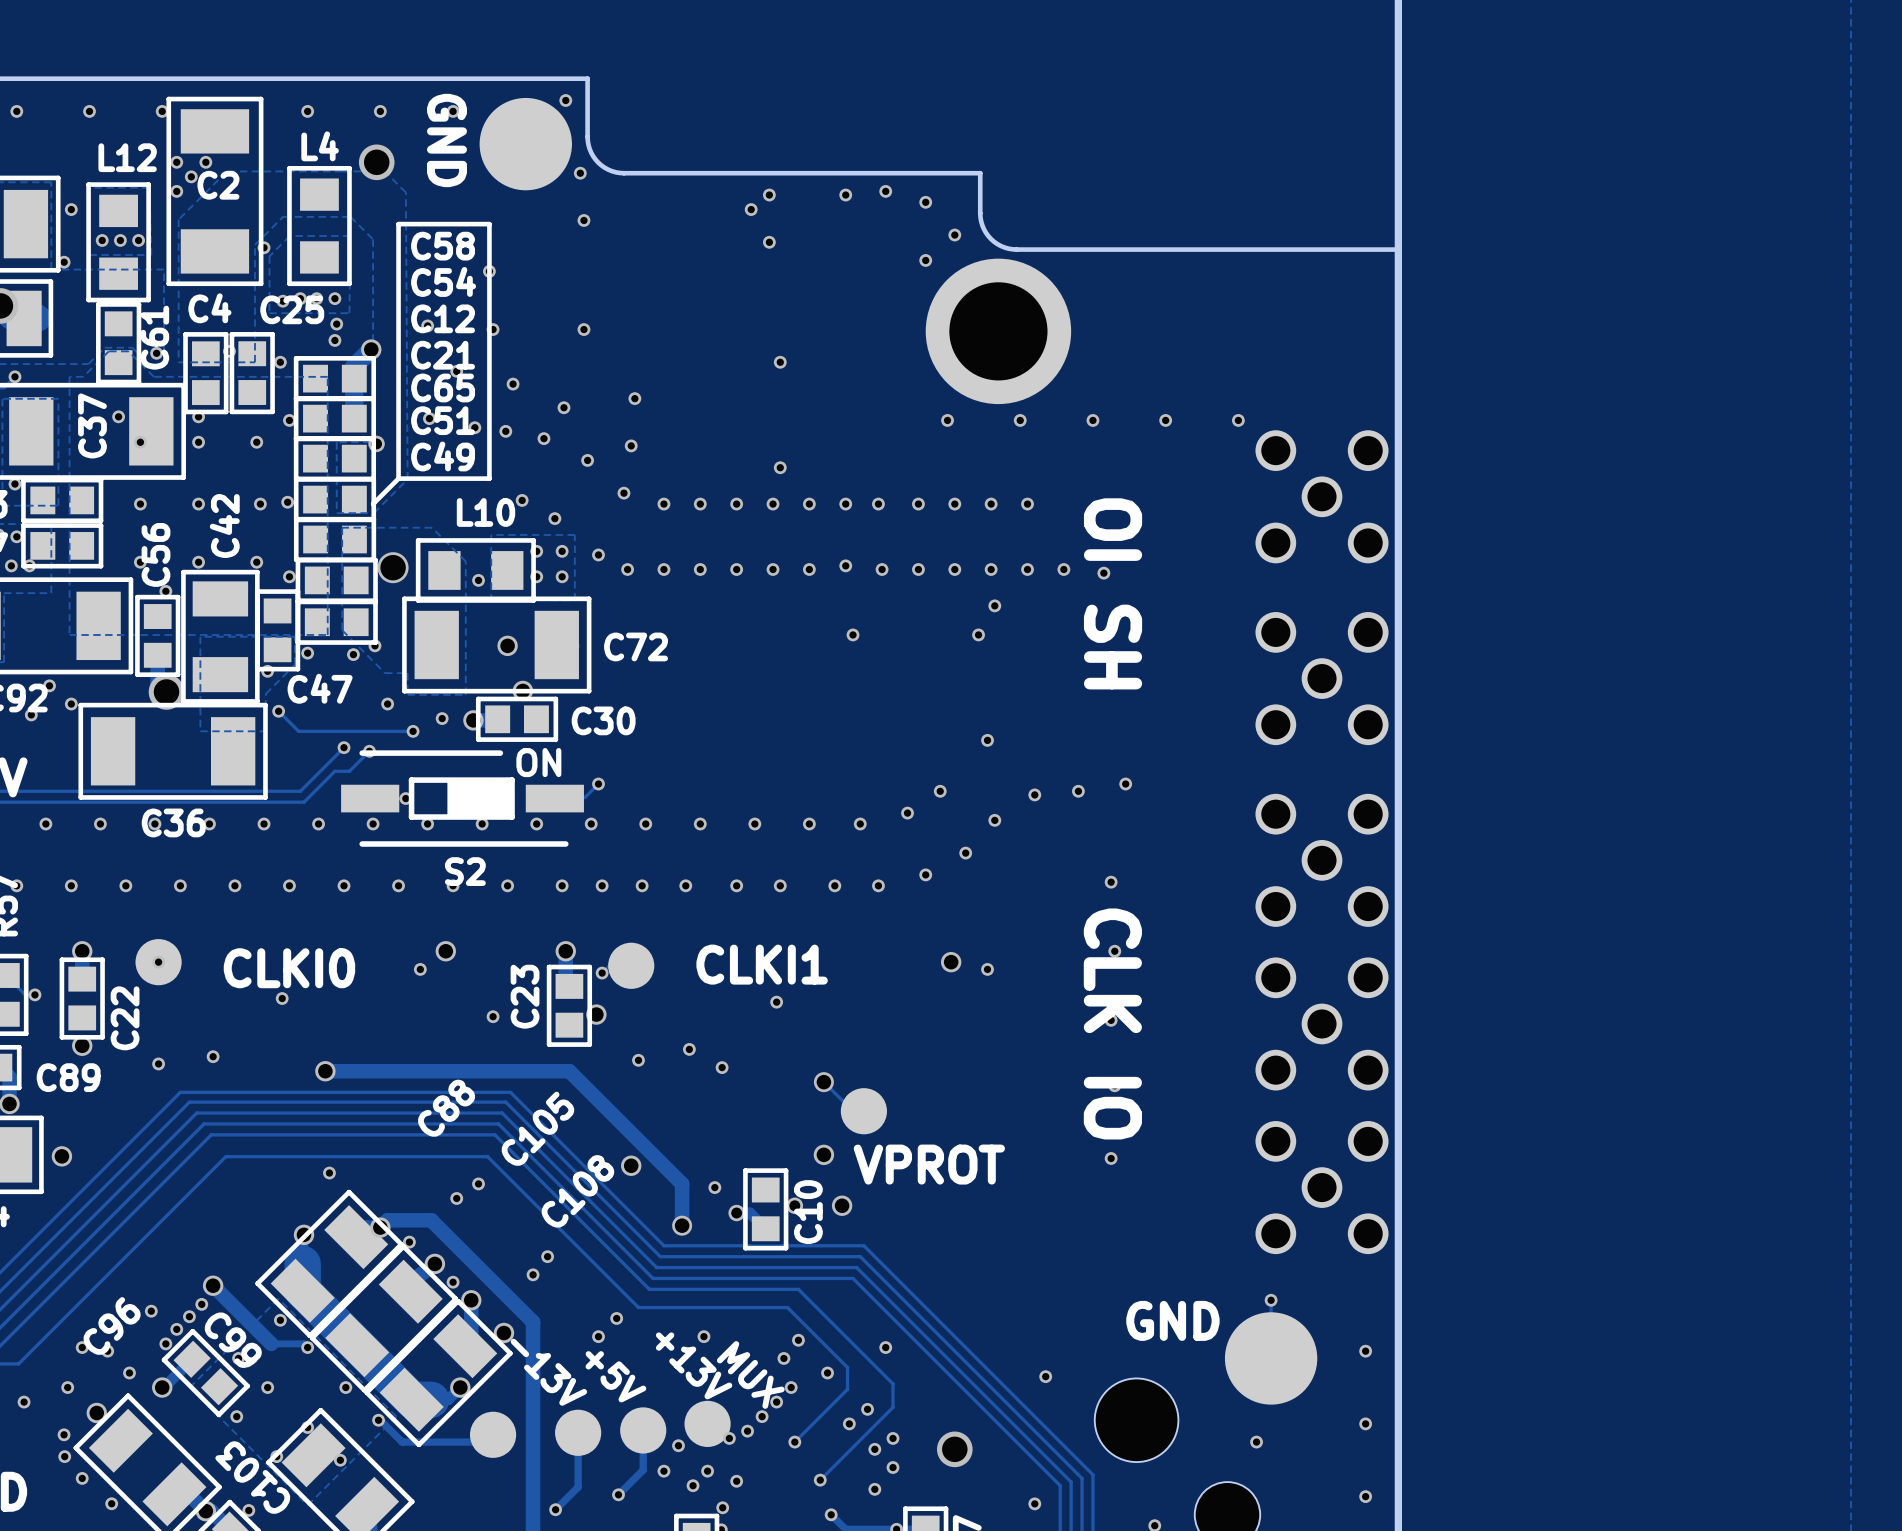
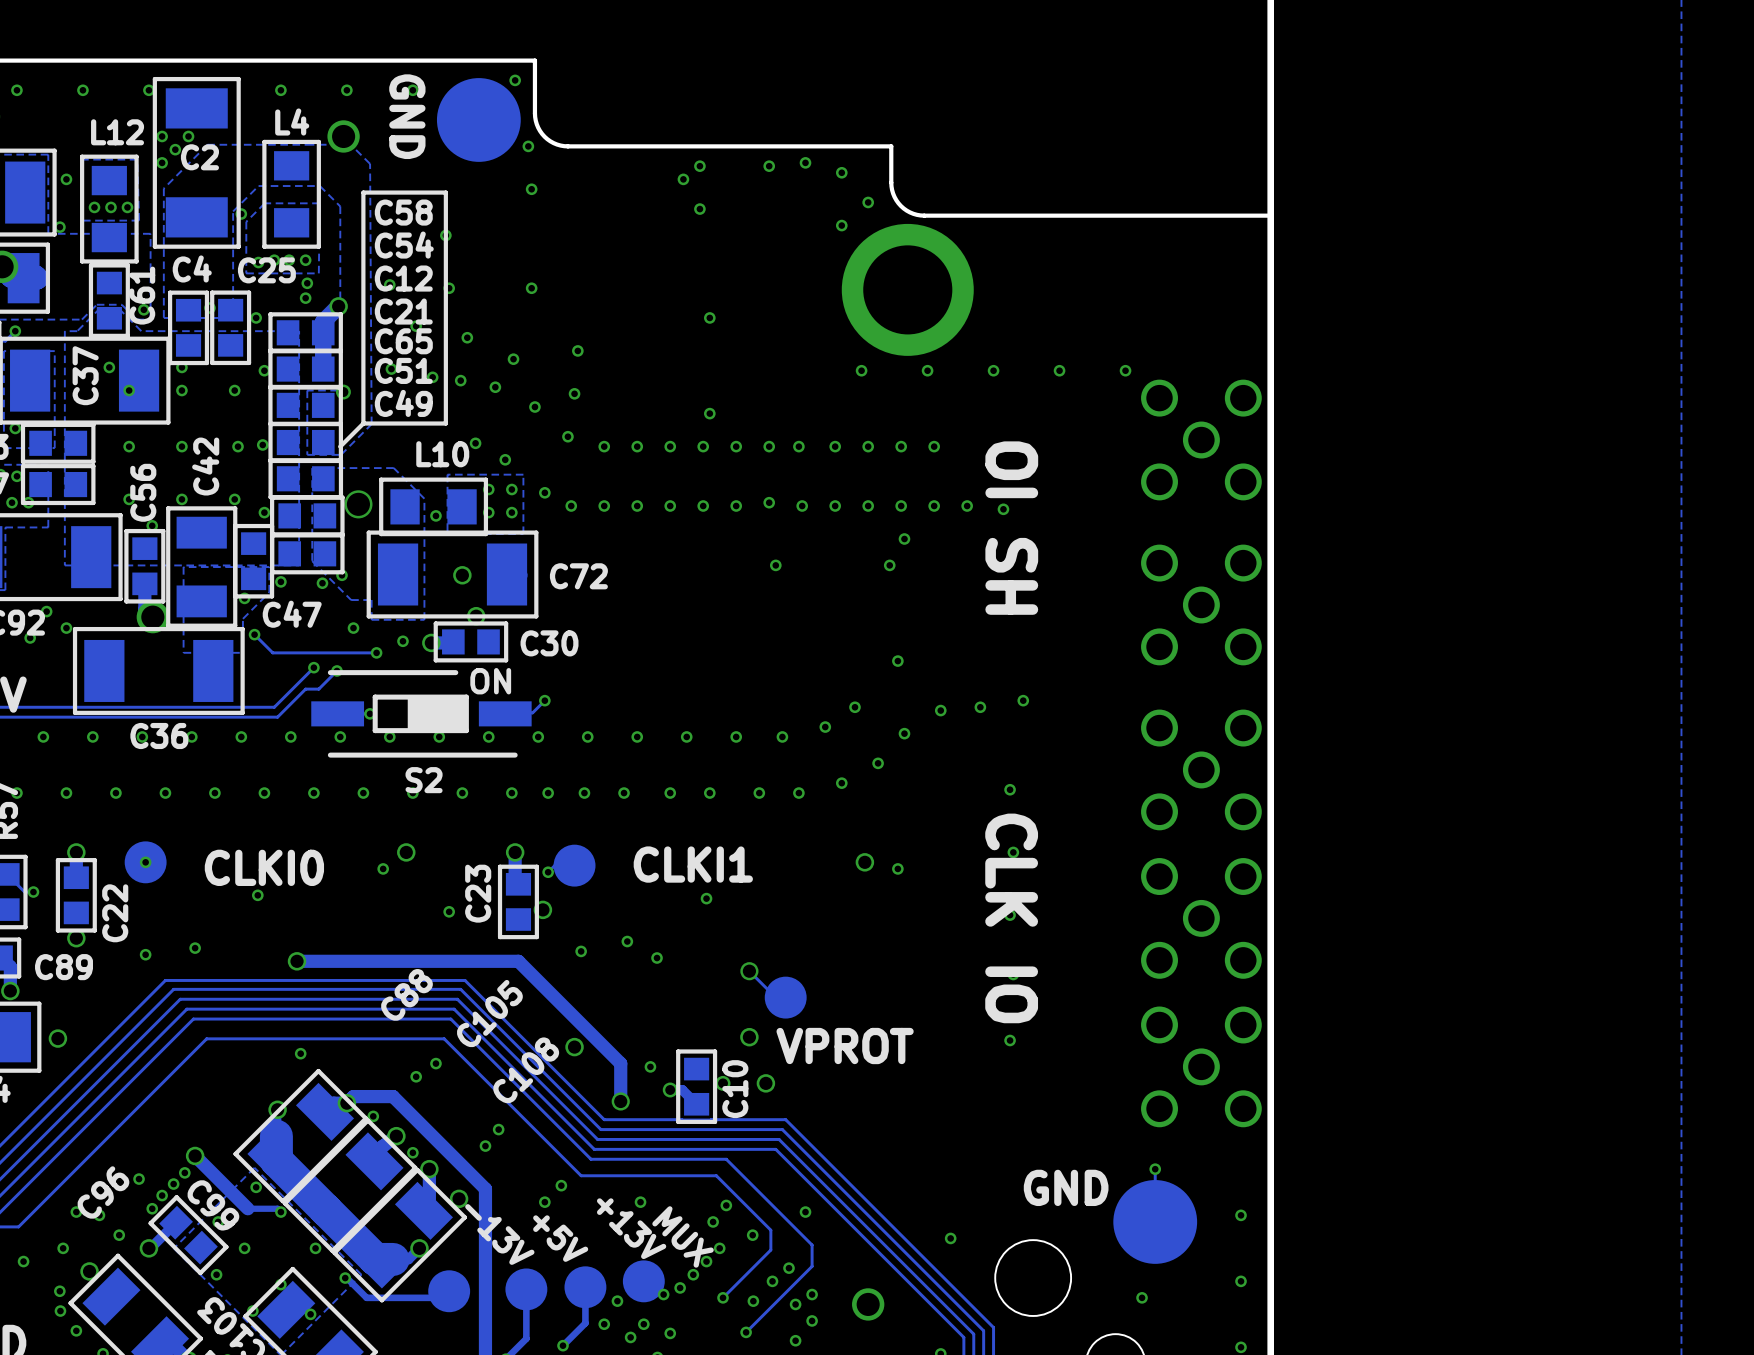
via: none -> (753, 1301)

